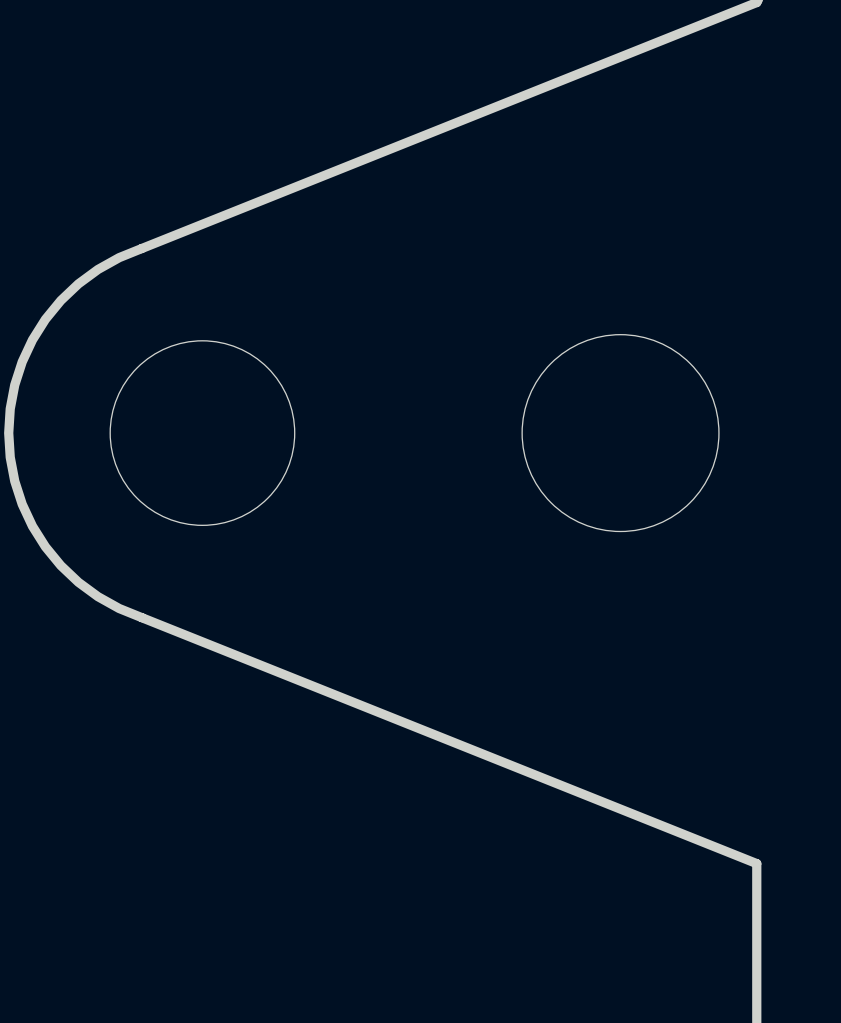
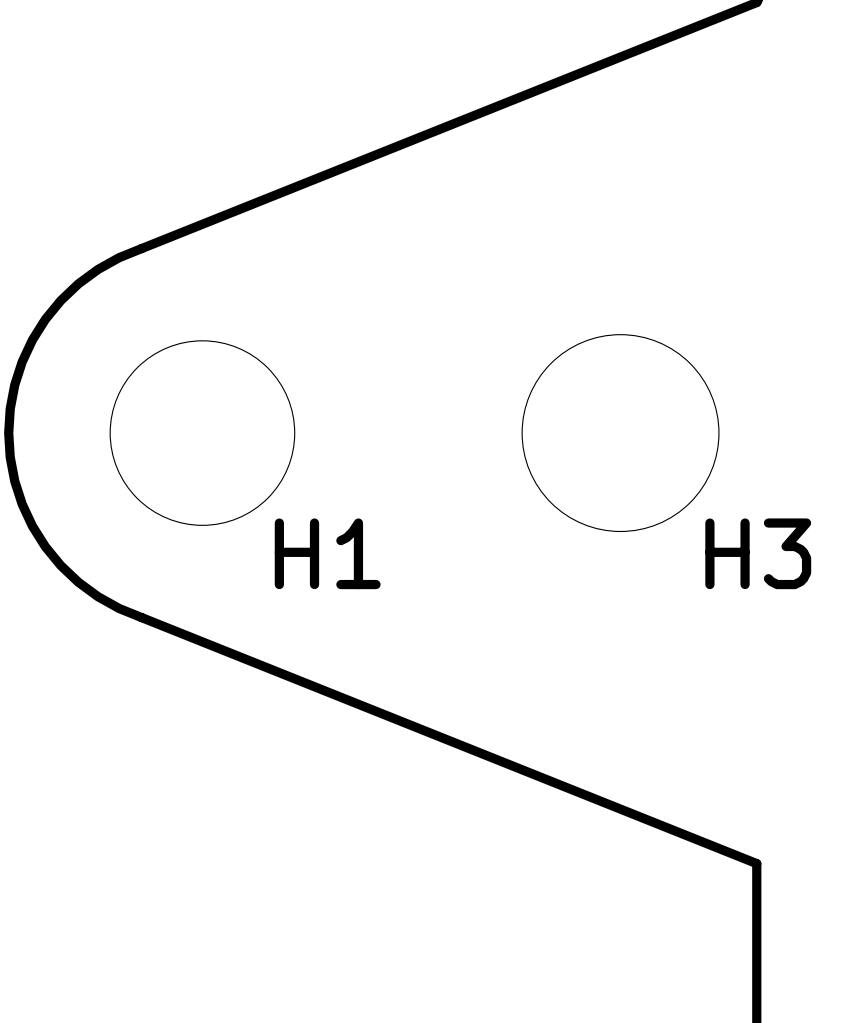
H1 name: none -> H1 (327, 553)
H3 name: none -> H3 (758, 553)

